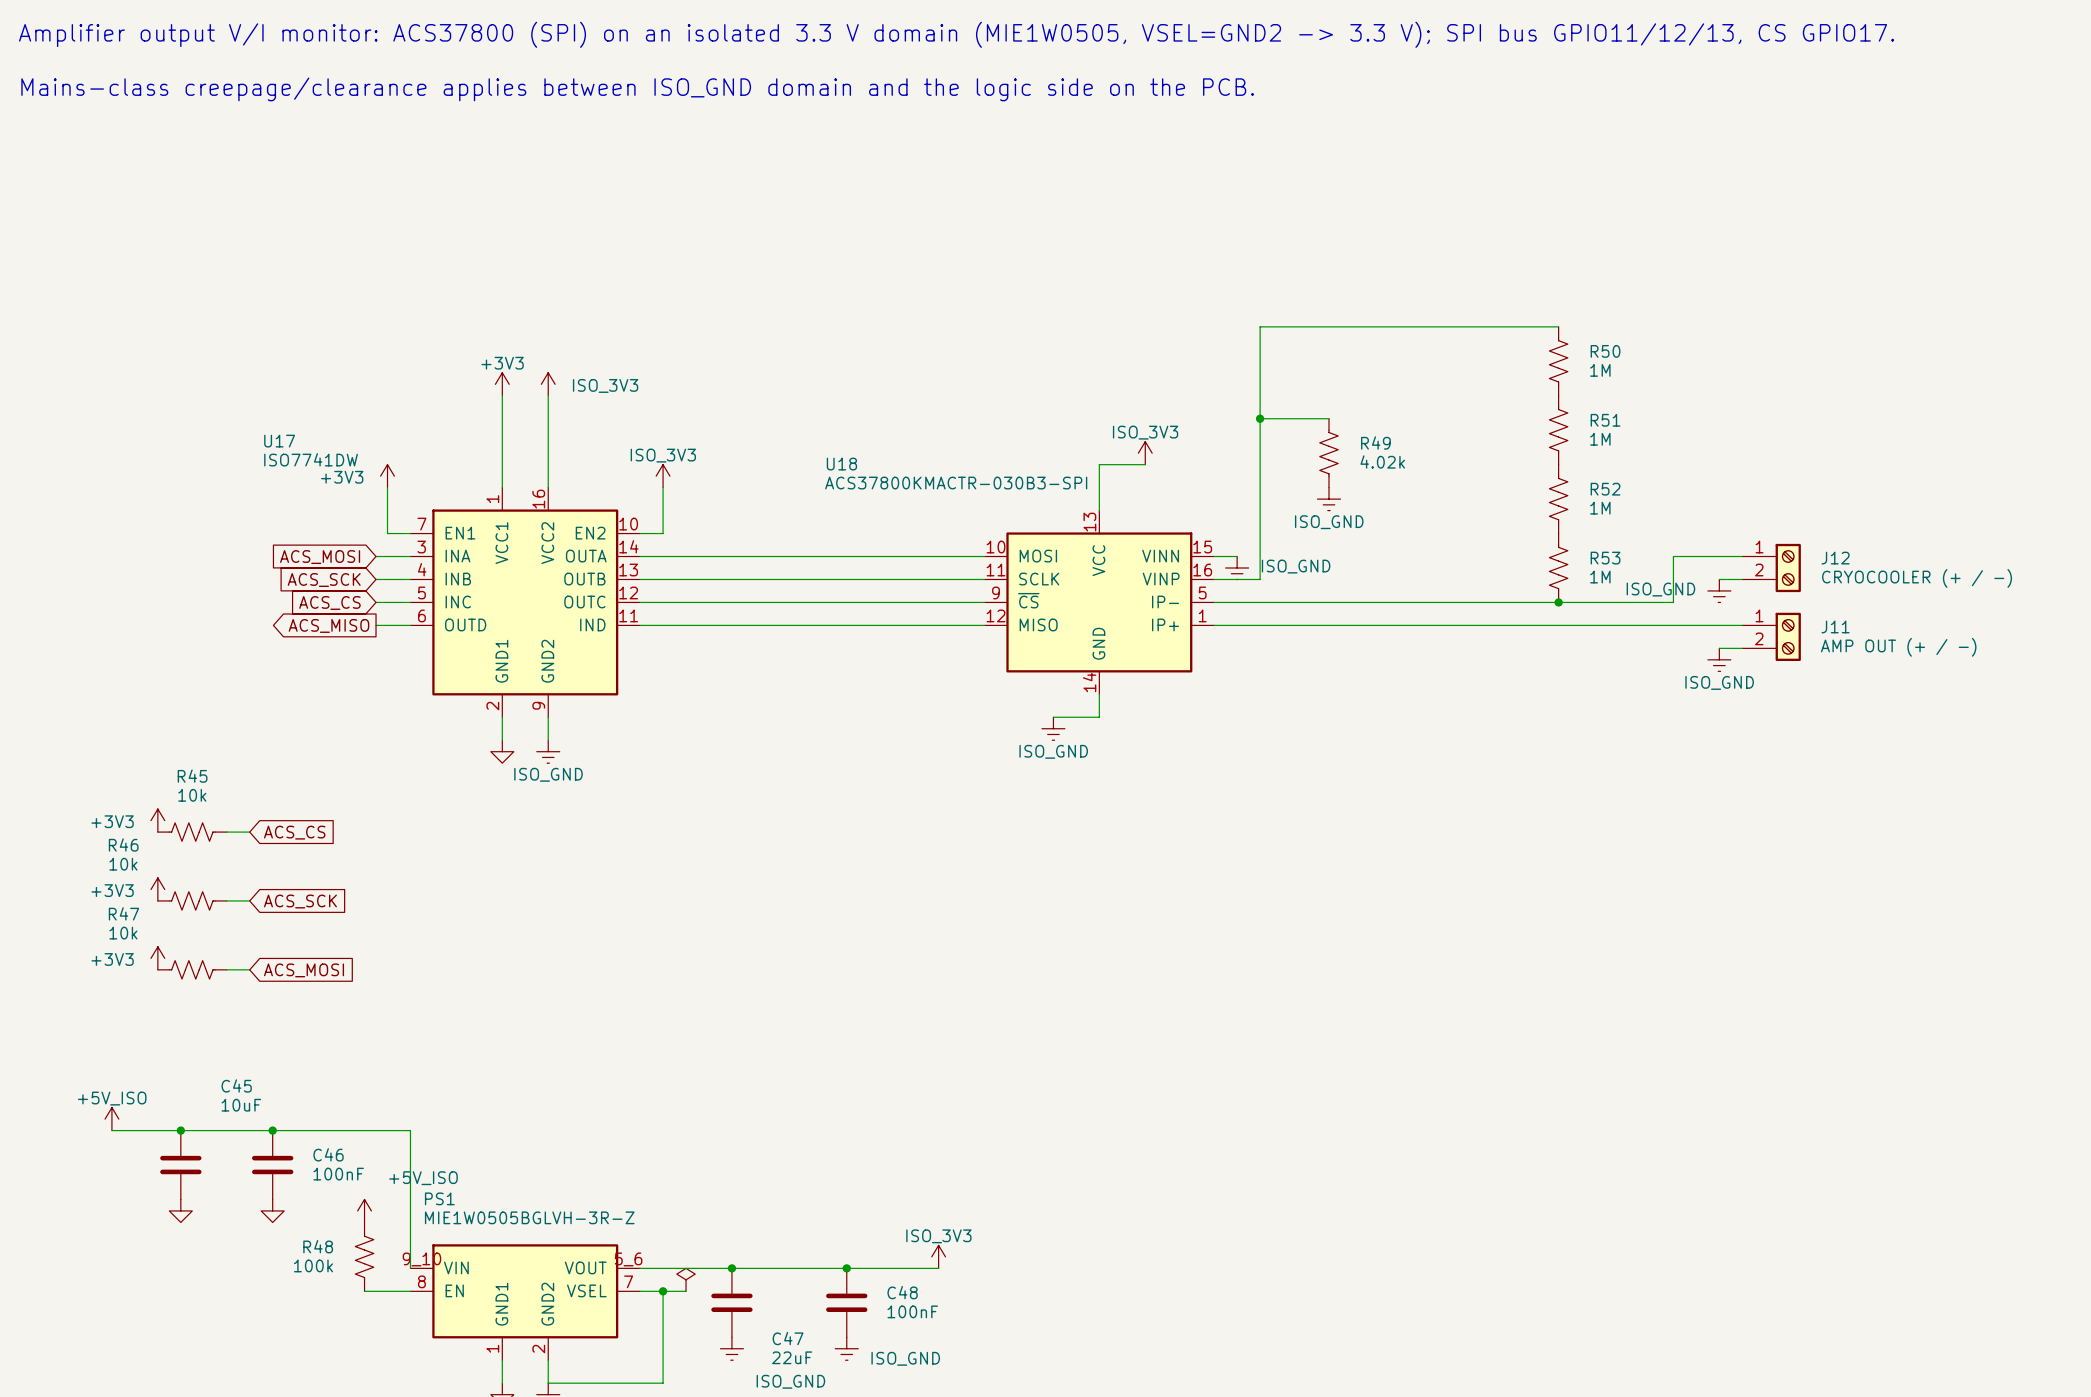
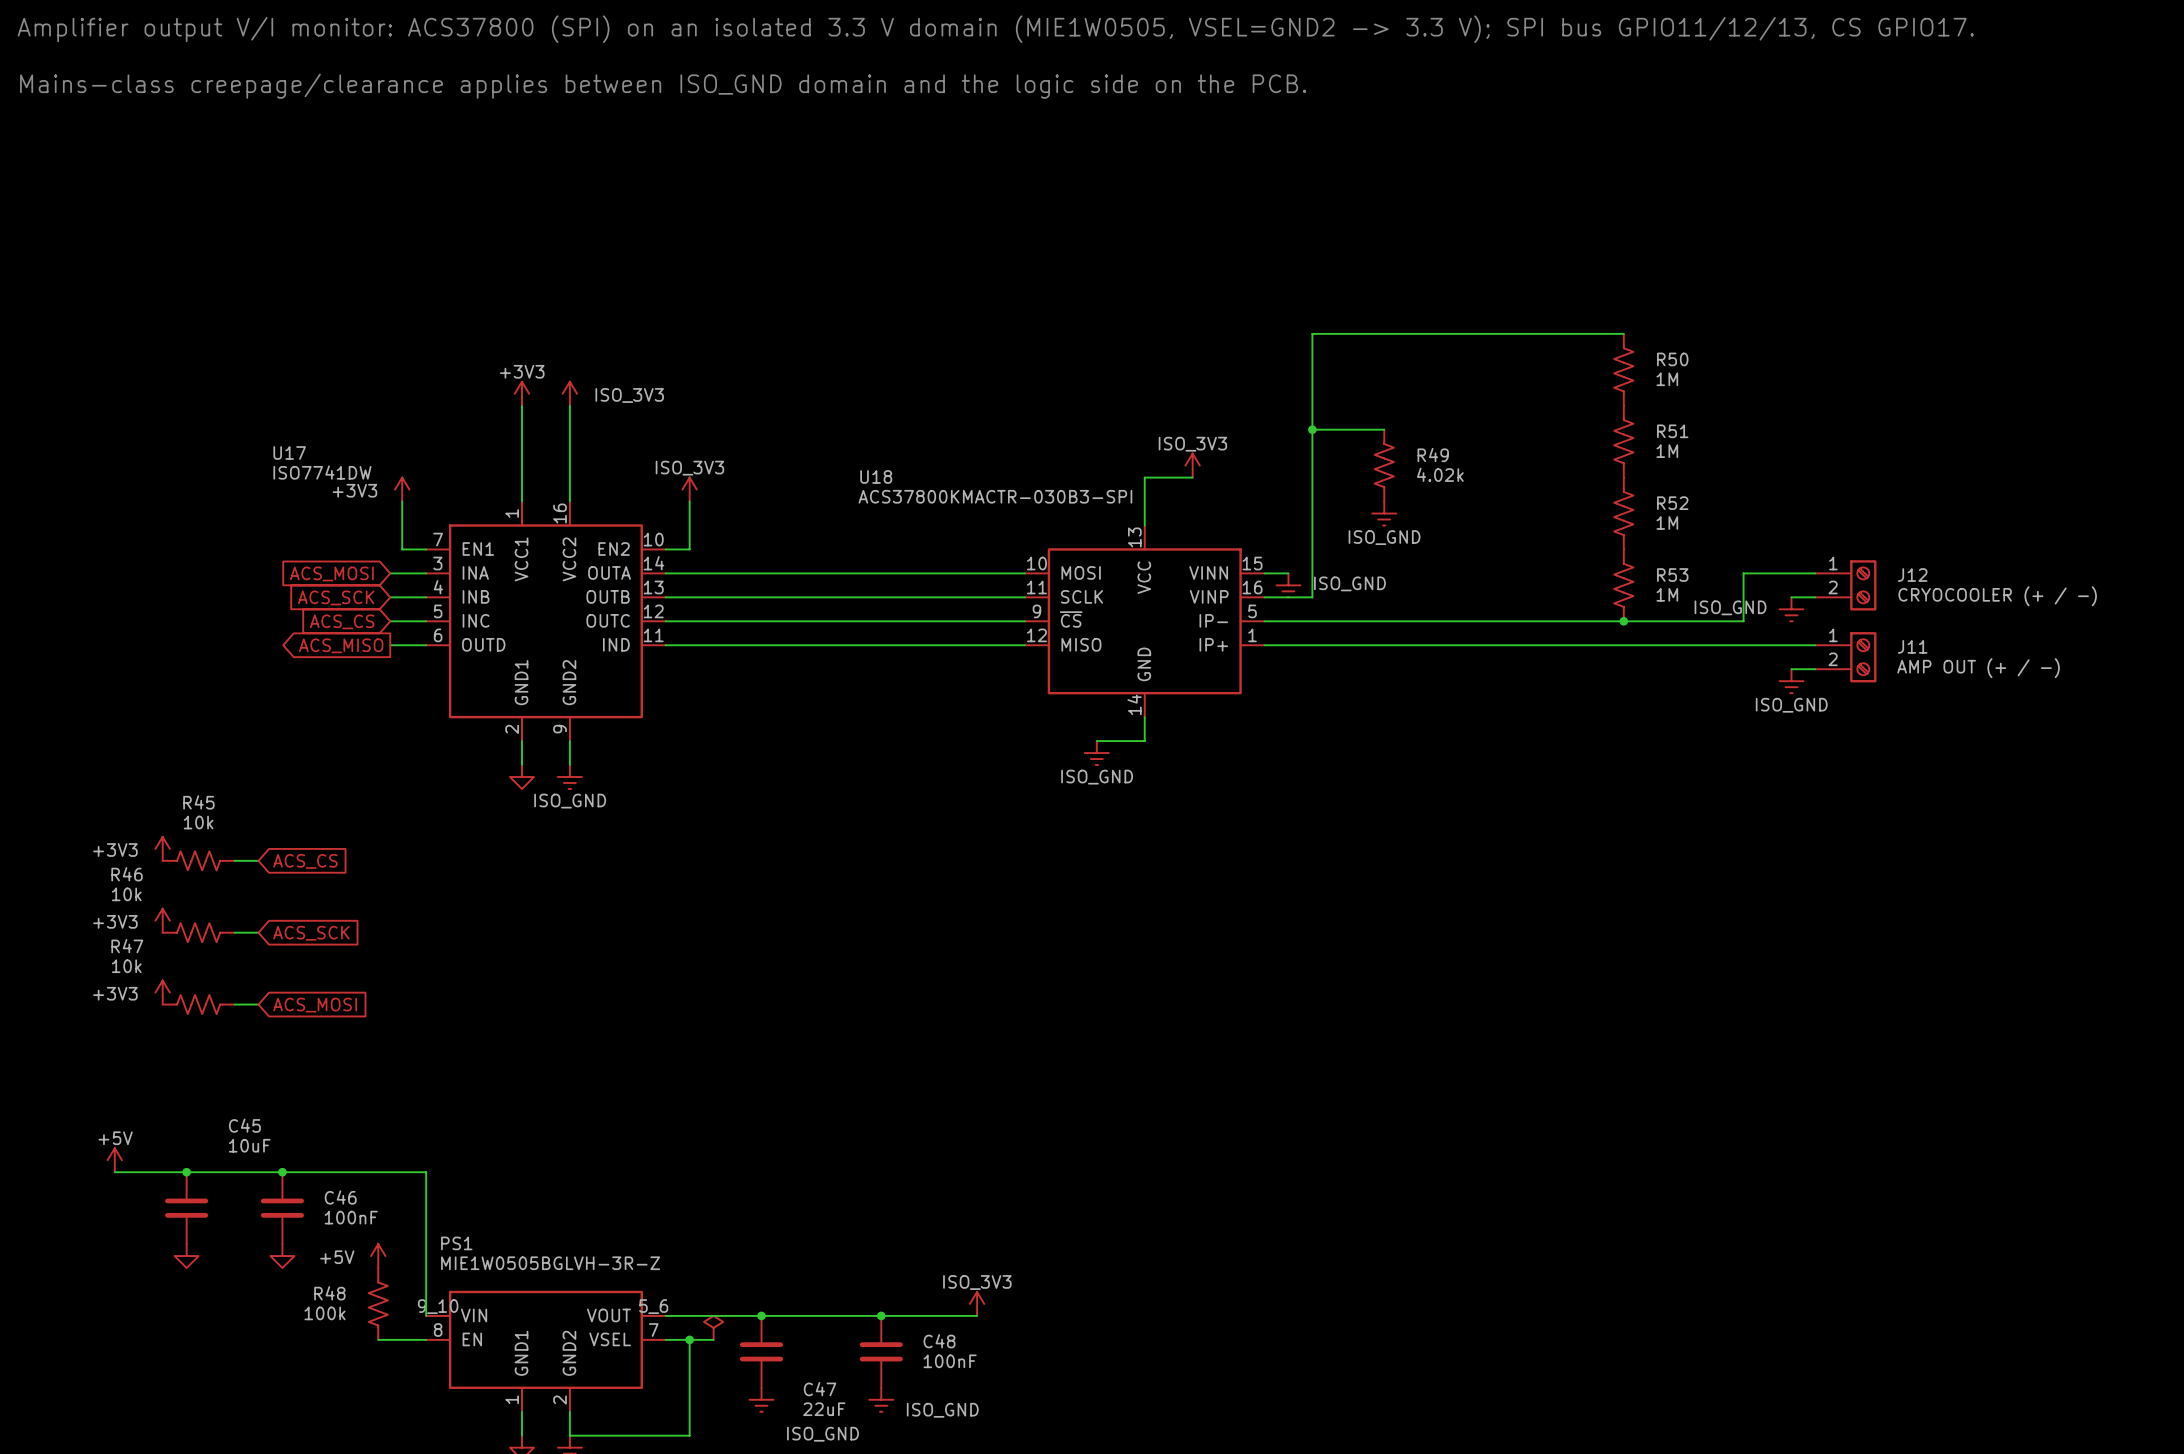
power symbol: +5V_ISO (111, 1119) -> +5V (114, 1160)
power symbol: +5V_ISO (364, 1210) -> +5V (378, 1256)

